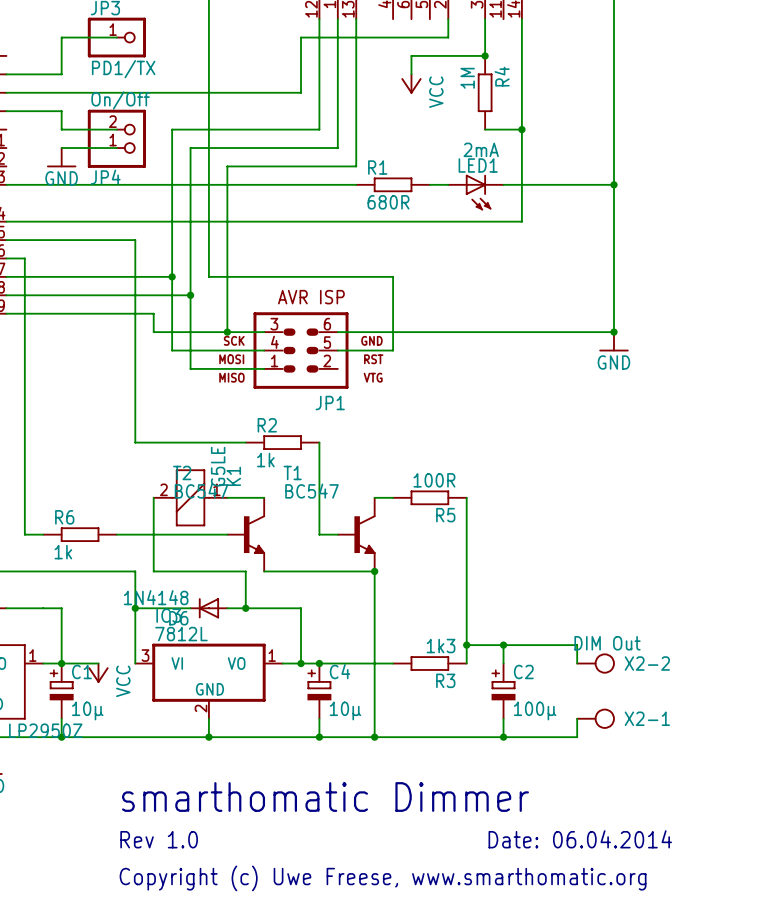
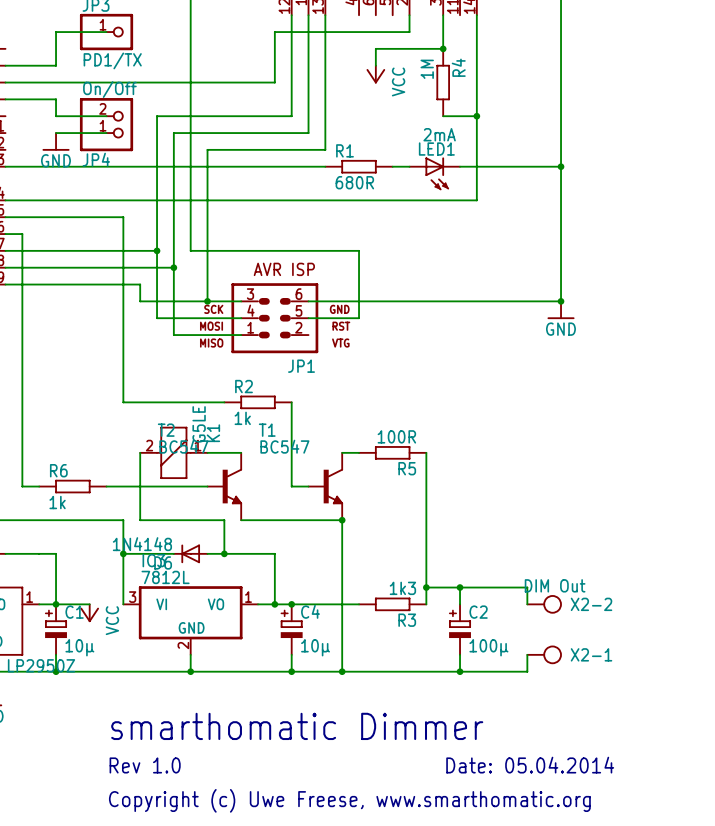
text: Date: 06.04.2014 (580, 839) -> Date: 05.04.2014 (530, 765)

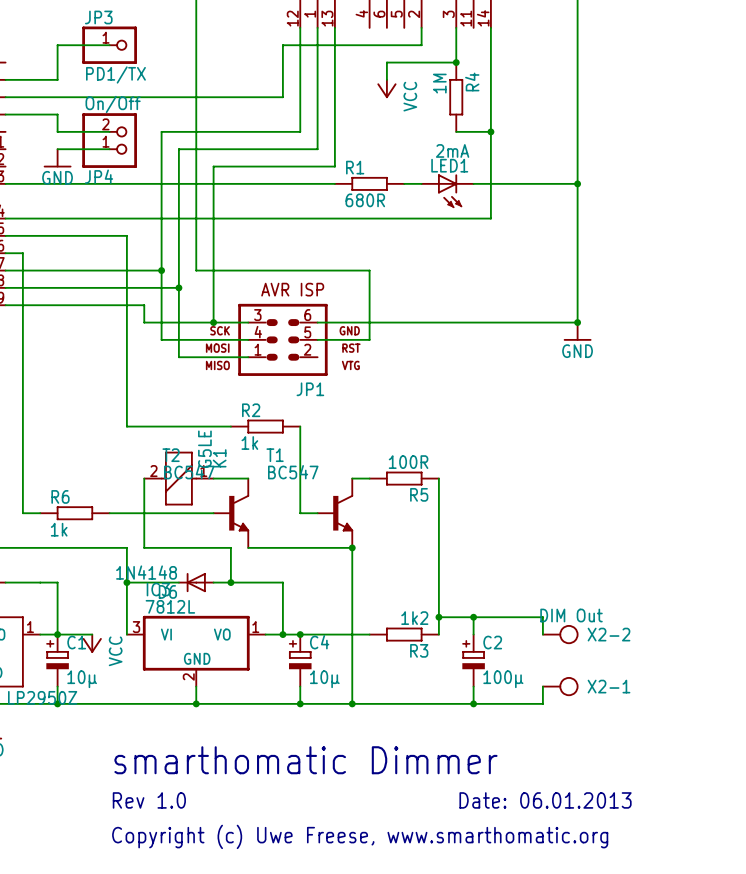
R3 value: 1k3 (402, 588) -> 1k2 (414, 618)
text: Date: 05.04.2014 (530, 765) -> Date: 06.01.2013 (545, 800)

